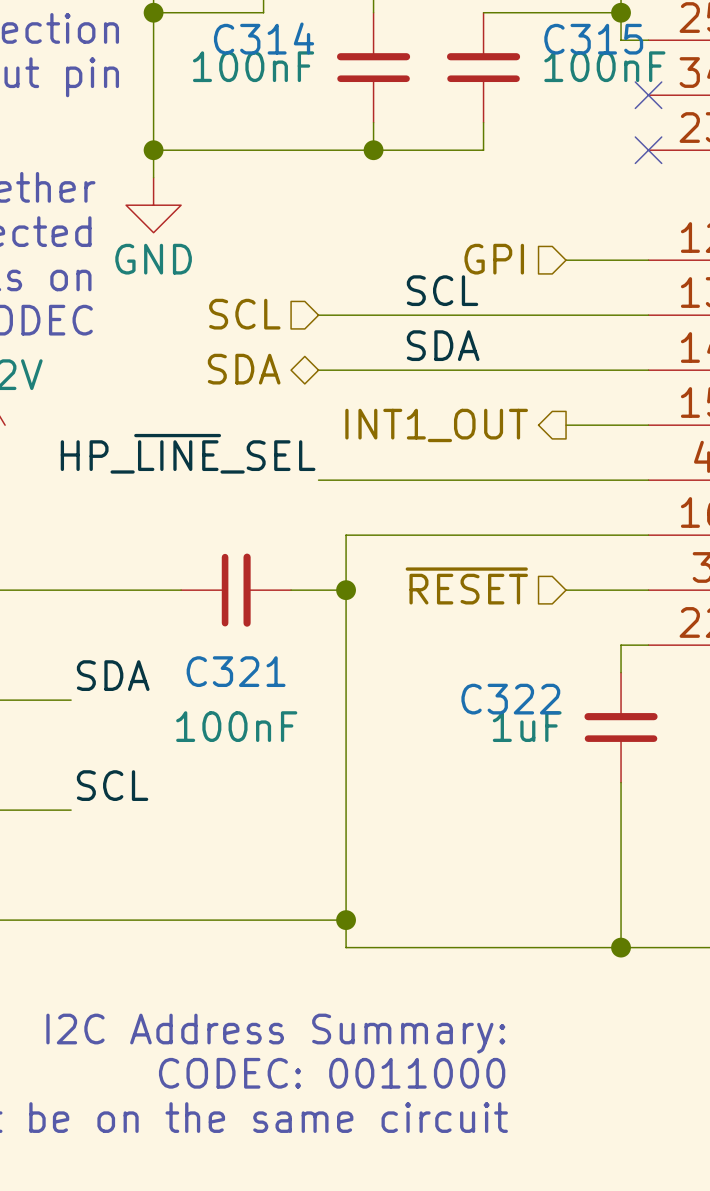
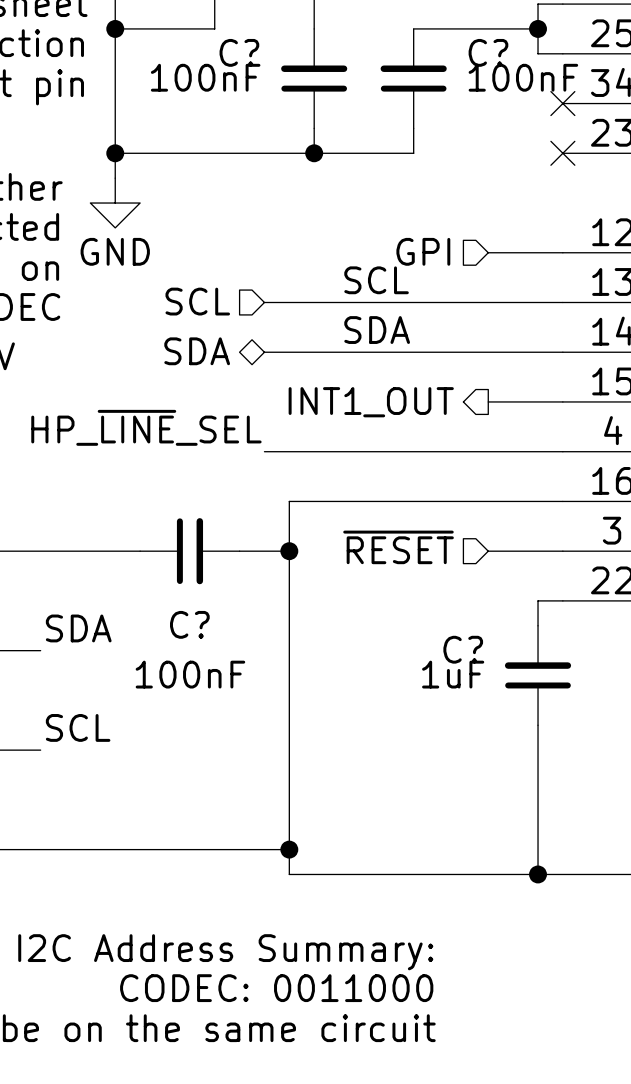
C314 name: C314 (264, 38) -> C? (239, 52)
C315 name: C315 (593, 39) -> C? (488, 52)
C321 name: C321 (236, 671) -> C? (189, 624)
C322 name: C322 (510, 699) -> C? (463, 649)

